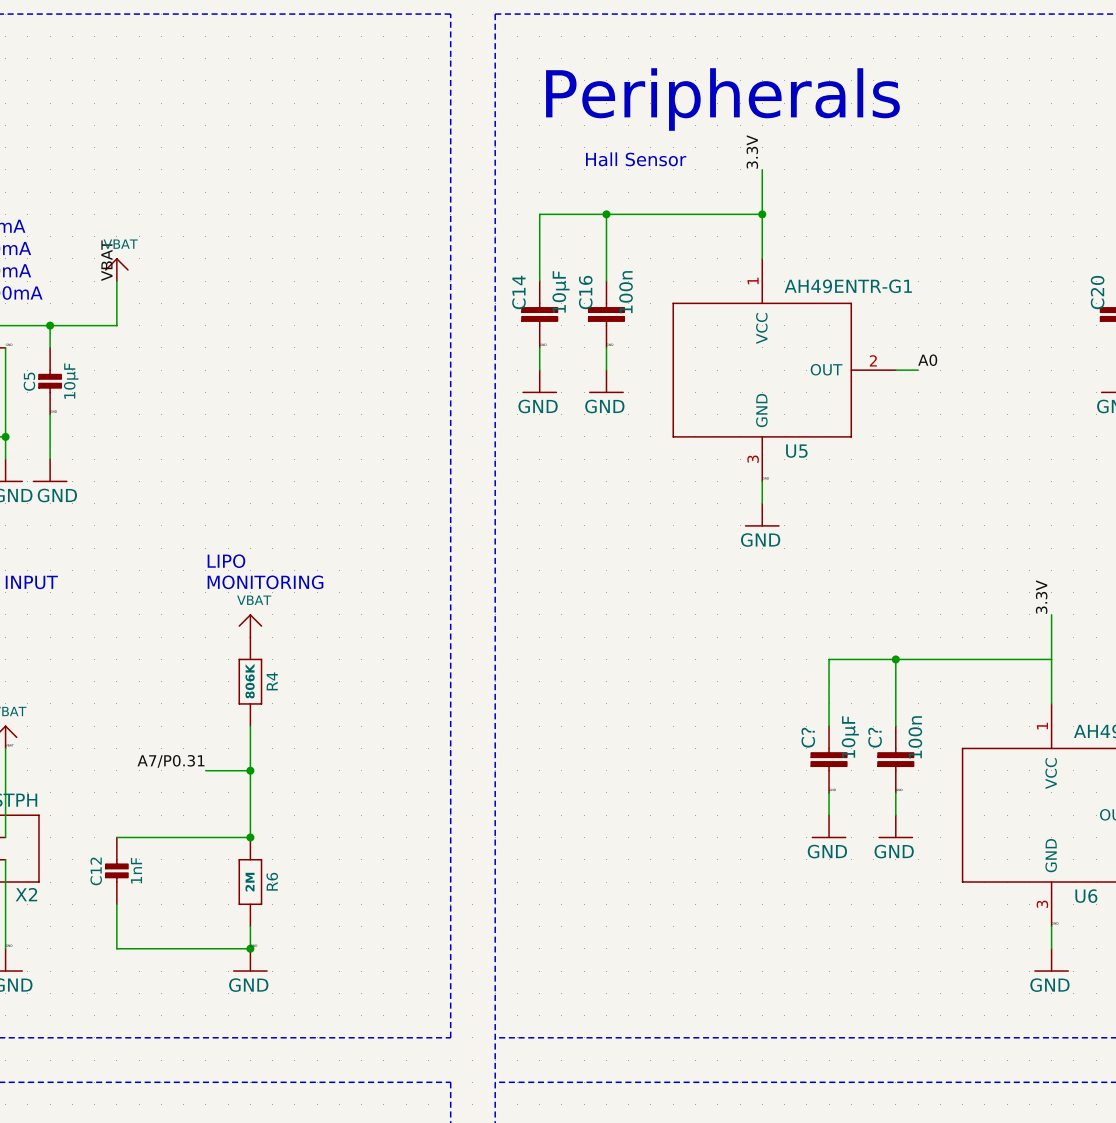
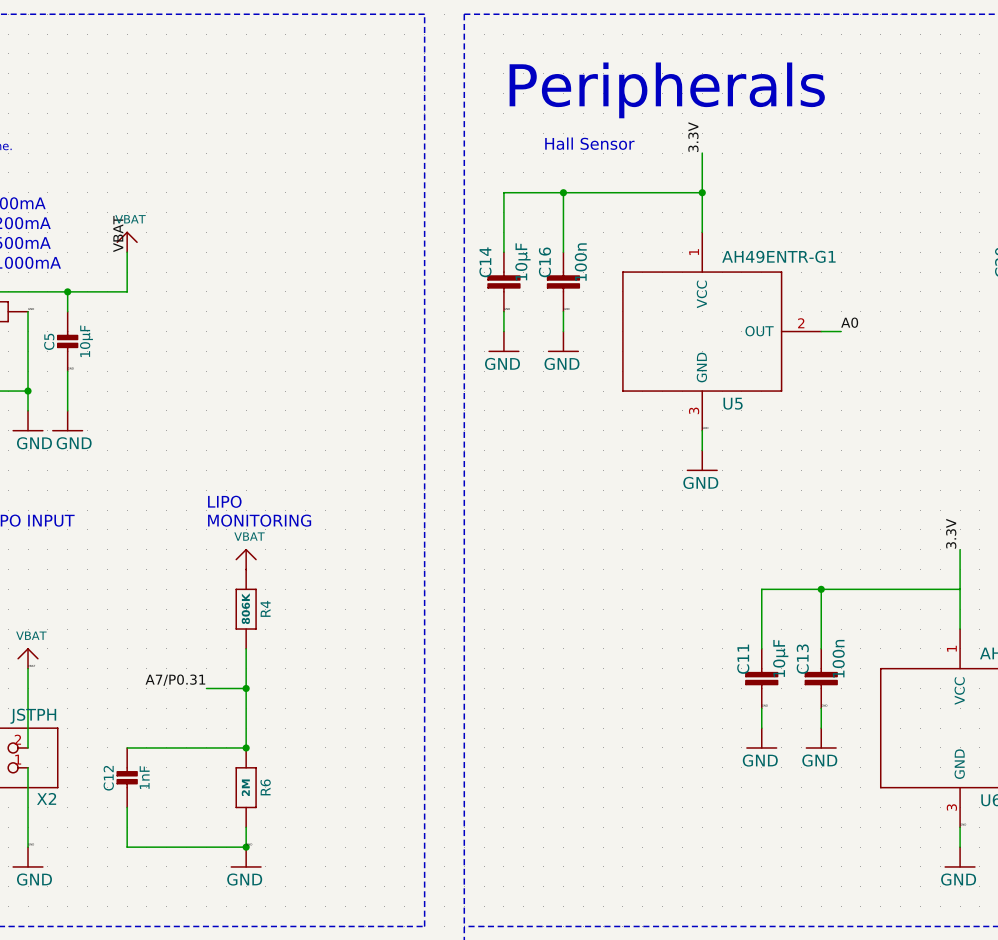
C? name: C? (808, 737) -> C11 (743, 659)
C? name: C? (875, 737) -> C13 (802, 659)

